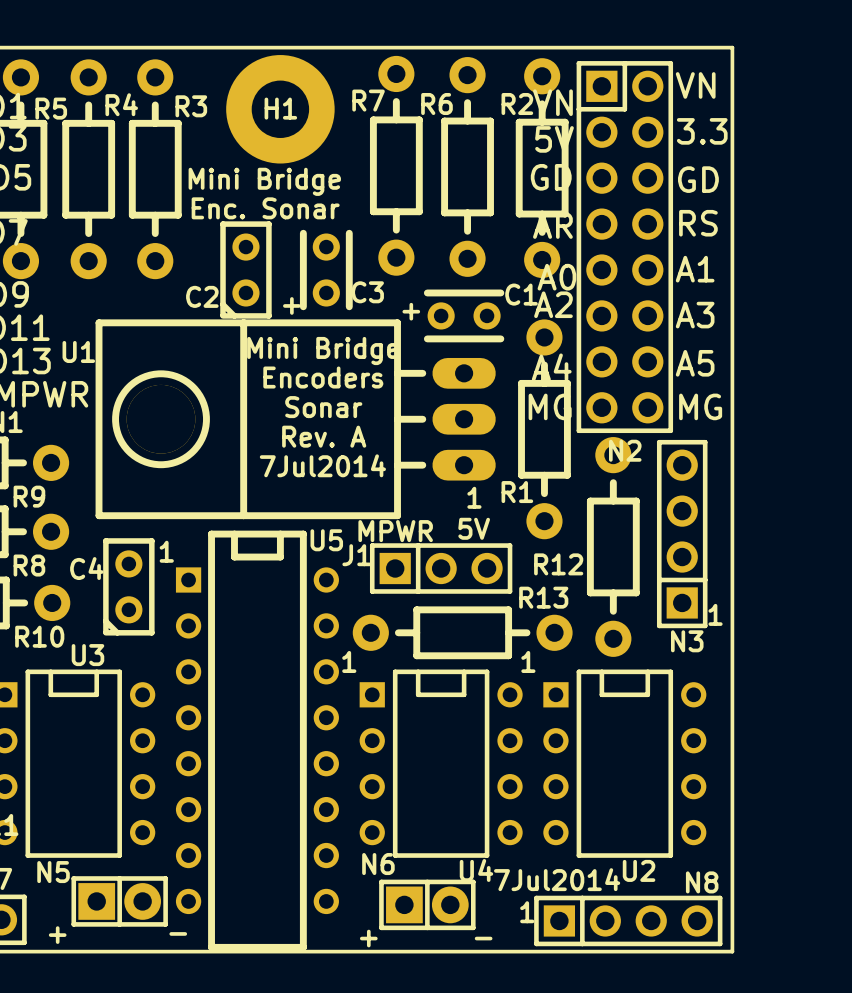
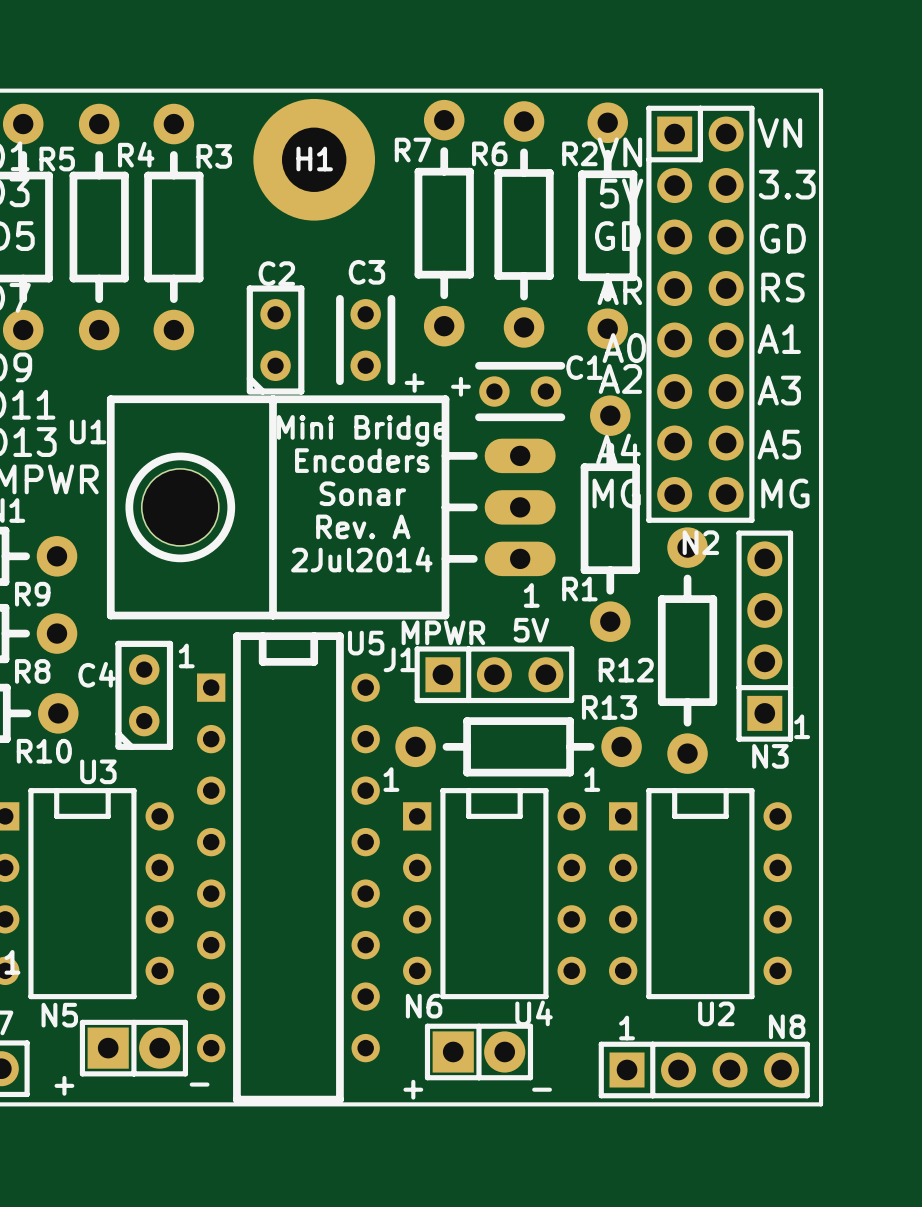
text: Mini Bridge (264, 181) -> none
text: Enc. Sonar (265, 208) -> none
C3 name position: C3 (367, 292) -> C3 (366, 272)
C2 name position: C2 (202, 296) -> C2 (276, 273)
text position: + (291, 305) -> + (414, 382)
U1 footprint: [95, 319, 496, 520] -> [106, 395, 556, 620]
text: 7Jul2014 (322, 465) -> 2Jul2014 (361, 559)
text: 7Jul2014 (557, 879) -> 1 (627, 1028)
text: 1 (527, 912) -> none

